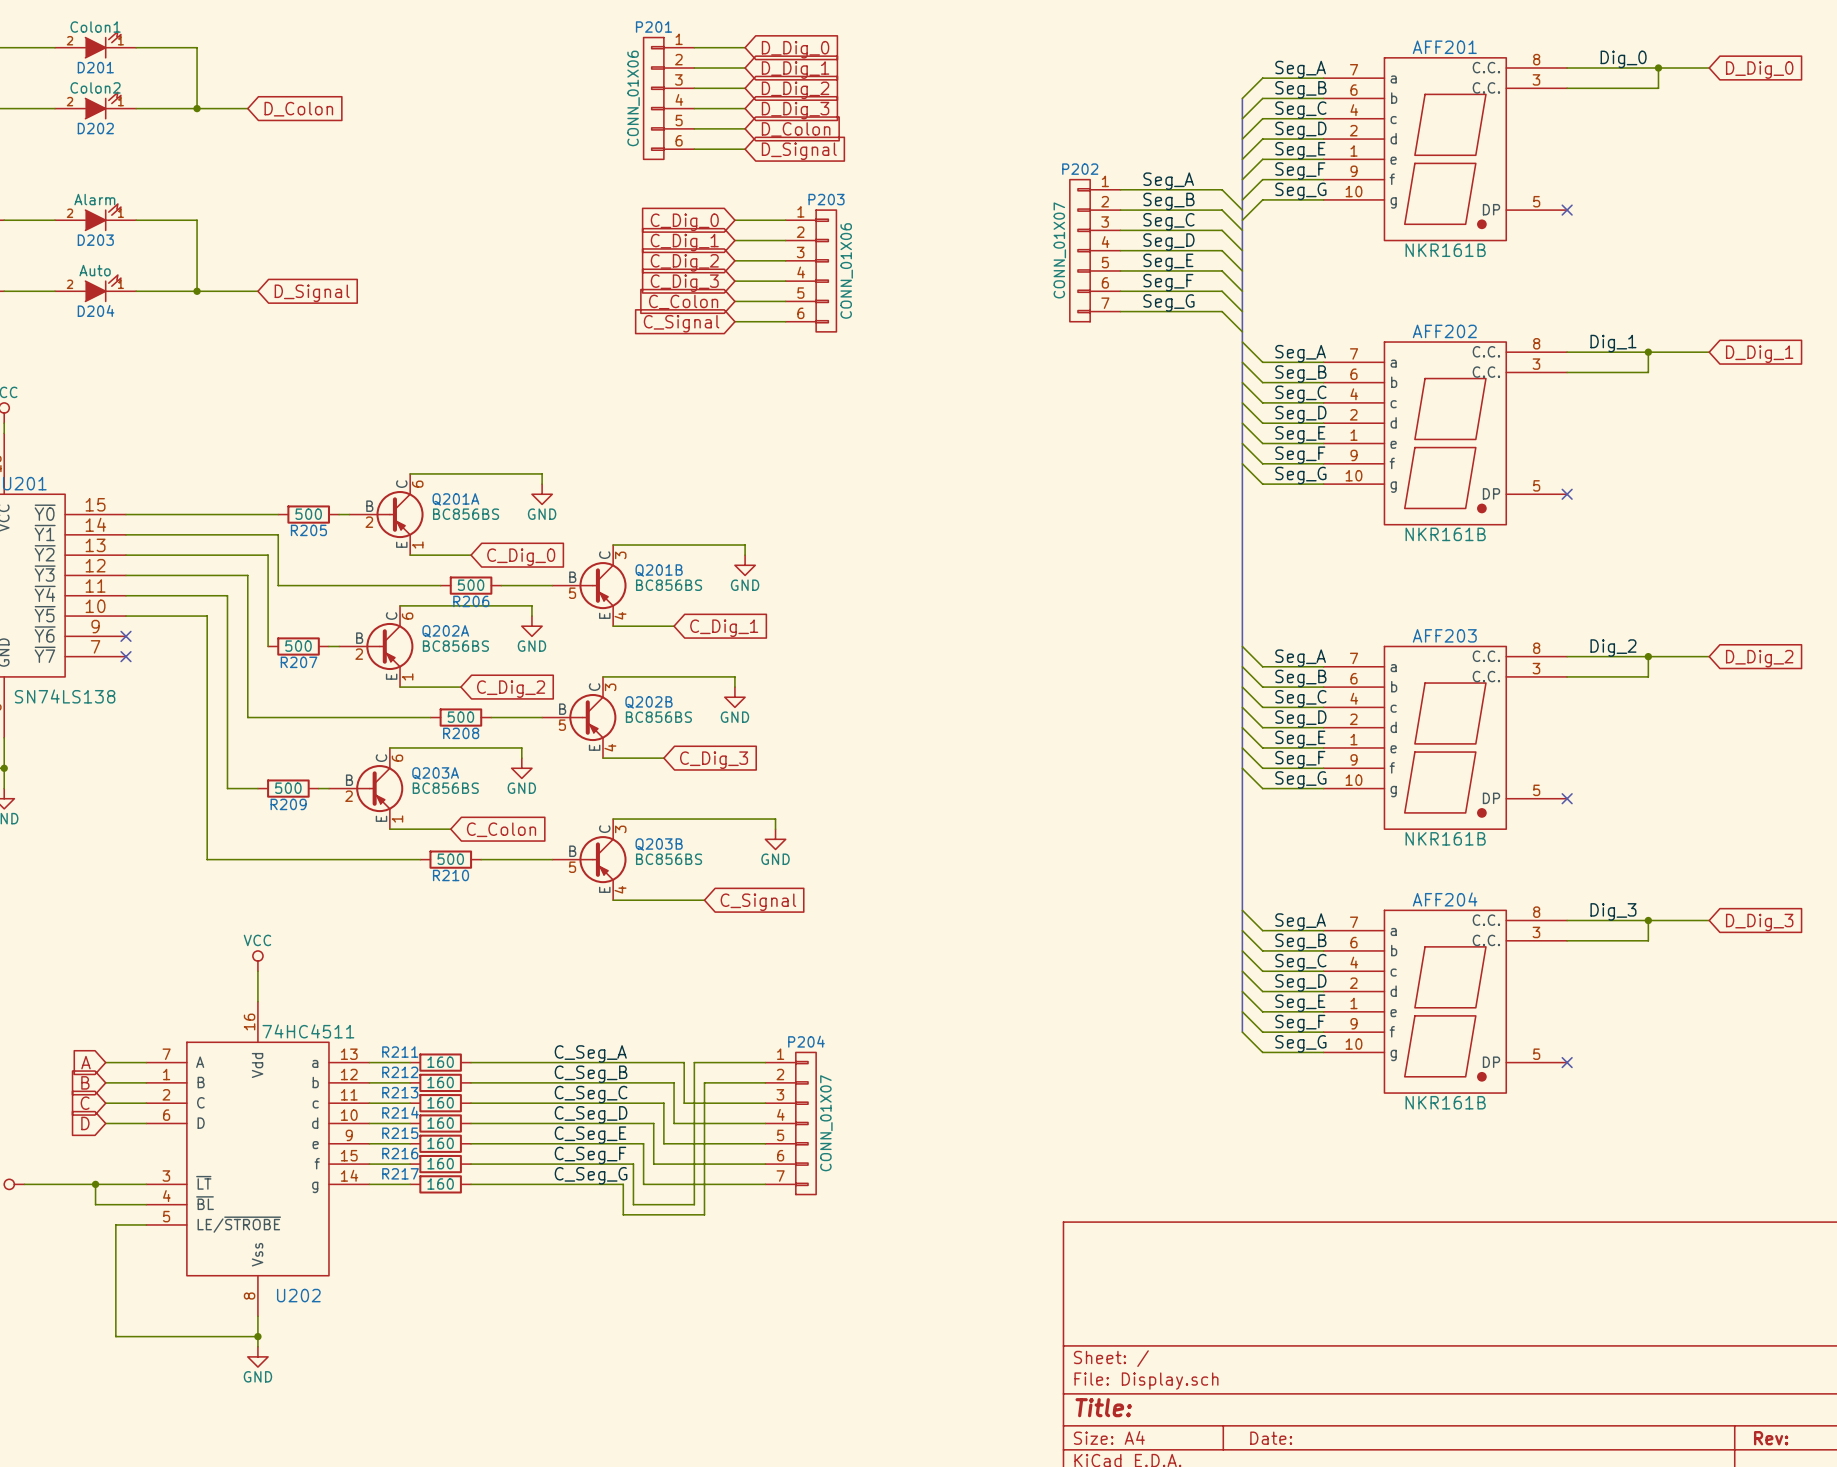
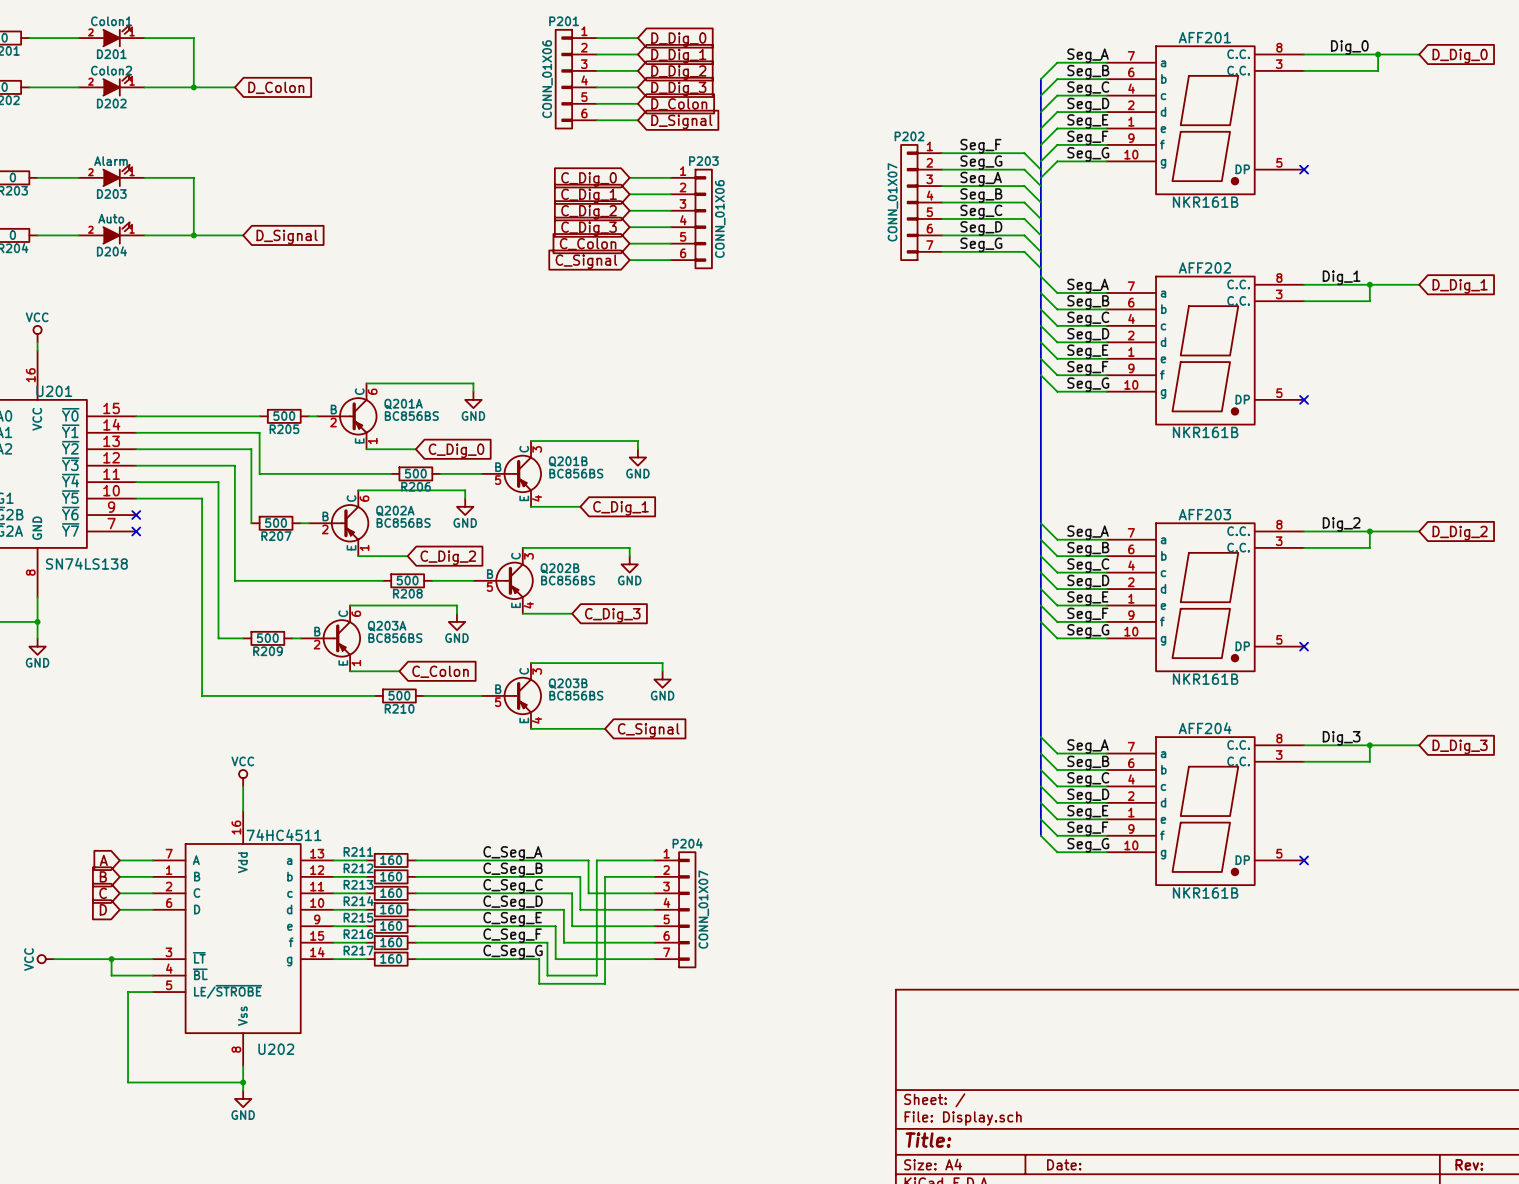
label: Seg_A (1168, 181) -> Seg_F (980, 146)
label: Seg_B (1168, 201) -> Seg_G (981, 162)
label: Seg_C (1168, 221) -> Seg_A (981, 179)
label: Seg_D (1168, 242) -> Seg_B (981, 195)
label: Seg_E (1168, 262) -> Seg_C (981, 212)
label: Seg_F (1168, 282) -> Seg_D (981, 228)

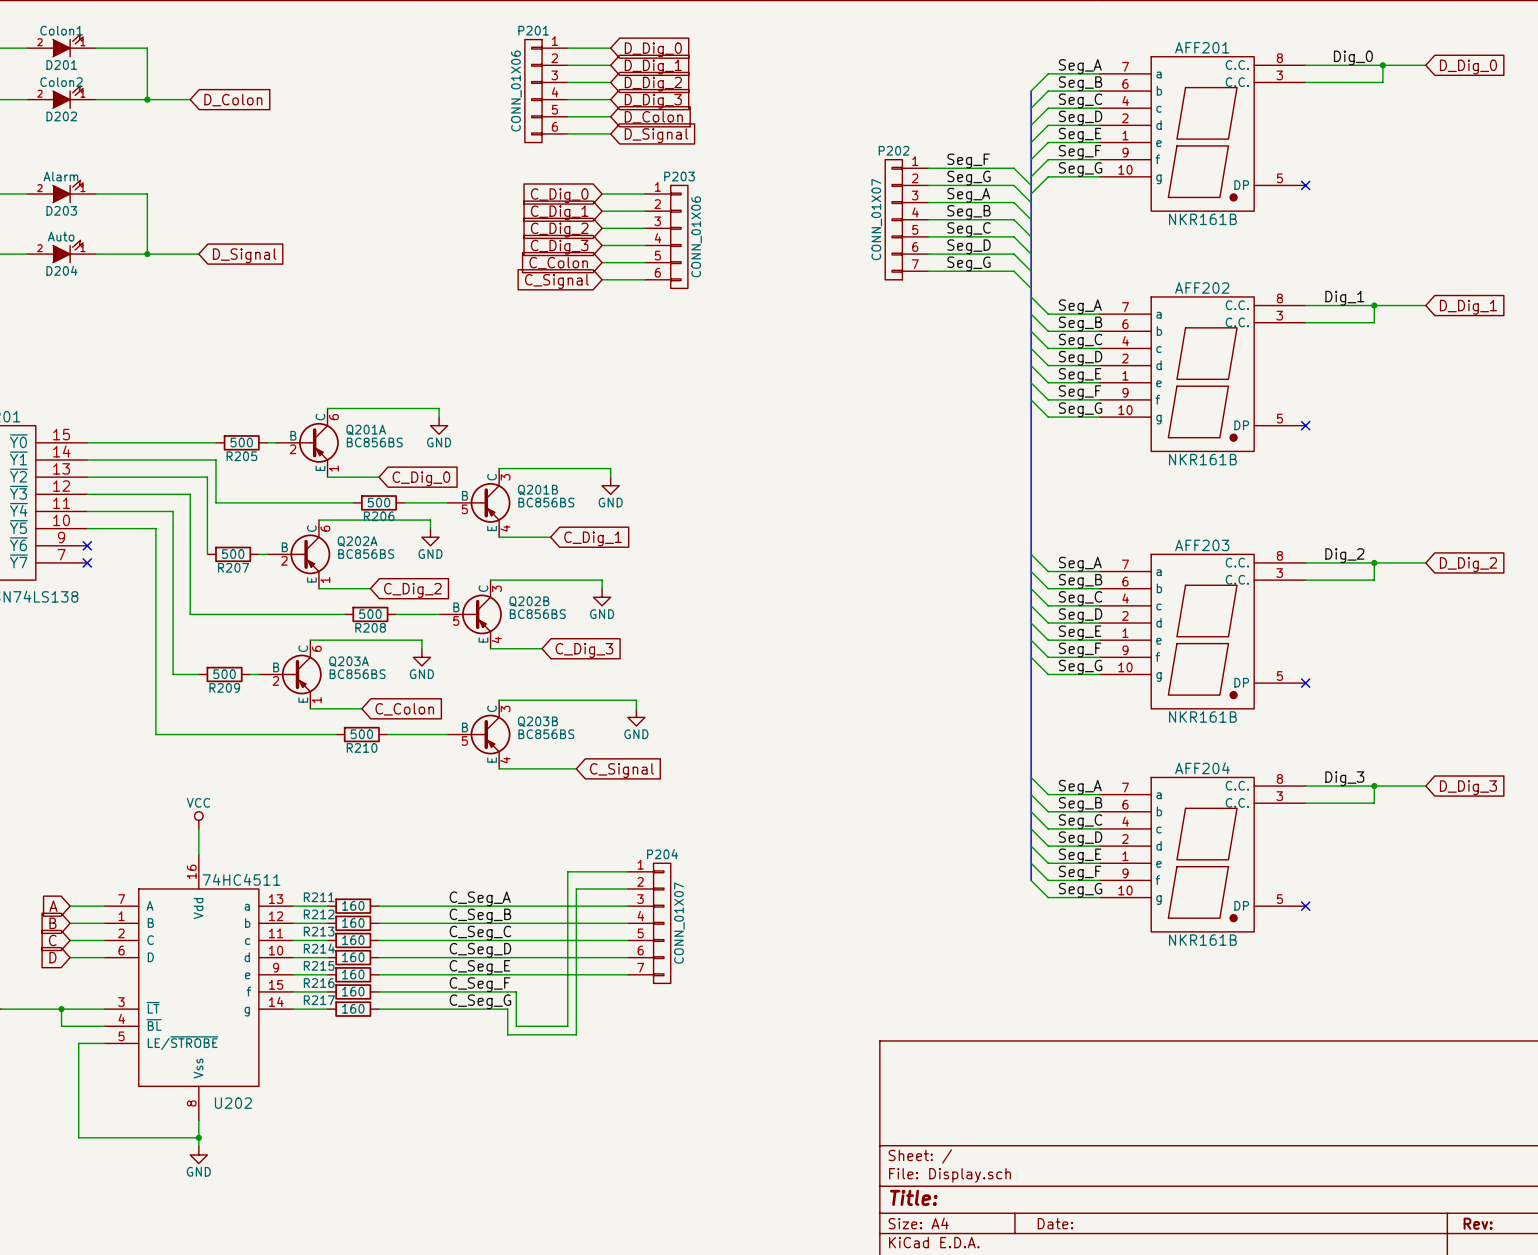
wire: none -> (627, 871) (567, 871) (567, 906) (559, 906)
wire: none -> (627, 888) (576, 888) (576, 923) (550, 923)
wire: (588, 860) (588, 893) -> (542, 940) (559, 940)
wire: (580, 876) (580, 909) -> (533, 957) (550, 957)
wire: (572, 893) (572, 926) -> (524, 974) (542, 974)
wire: (563, 909) (563, 942) (654, 942) -> none
P204 position: (674, 909) -> (649, 923)
wire: (555, 926) (555, 959) (654, 959) -> none

